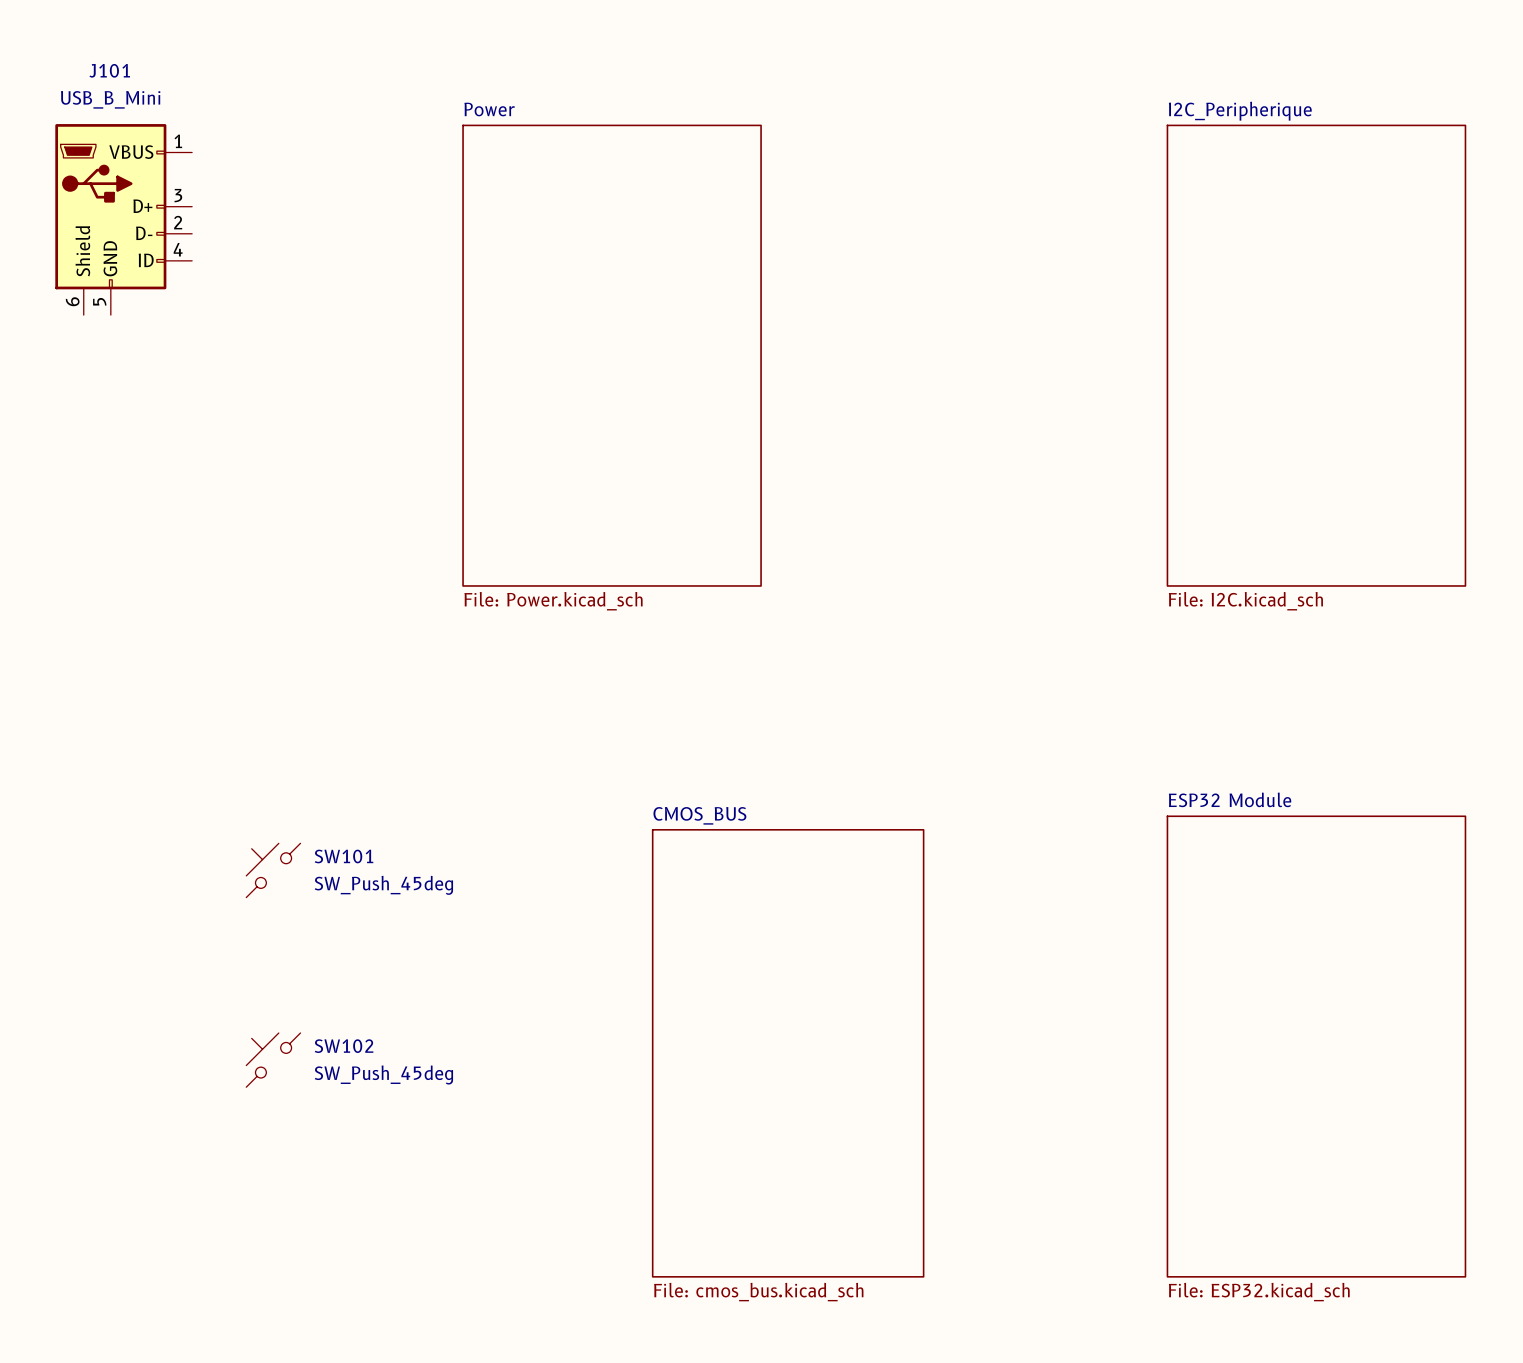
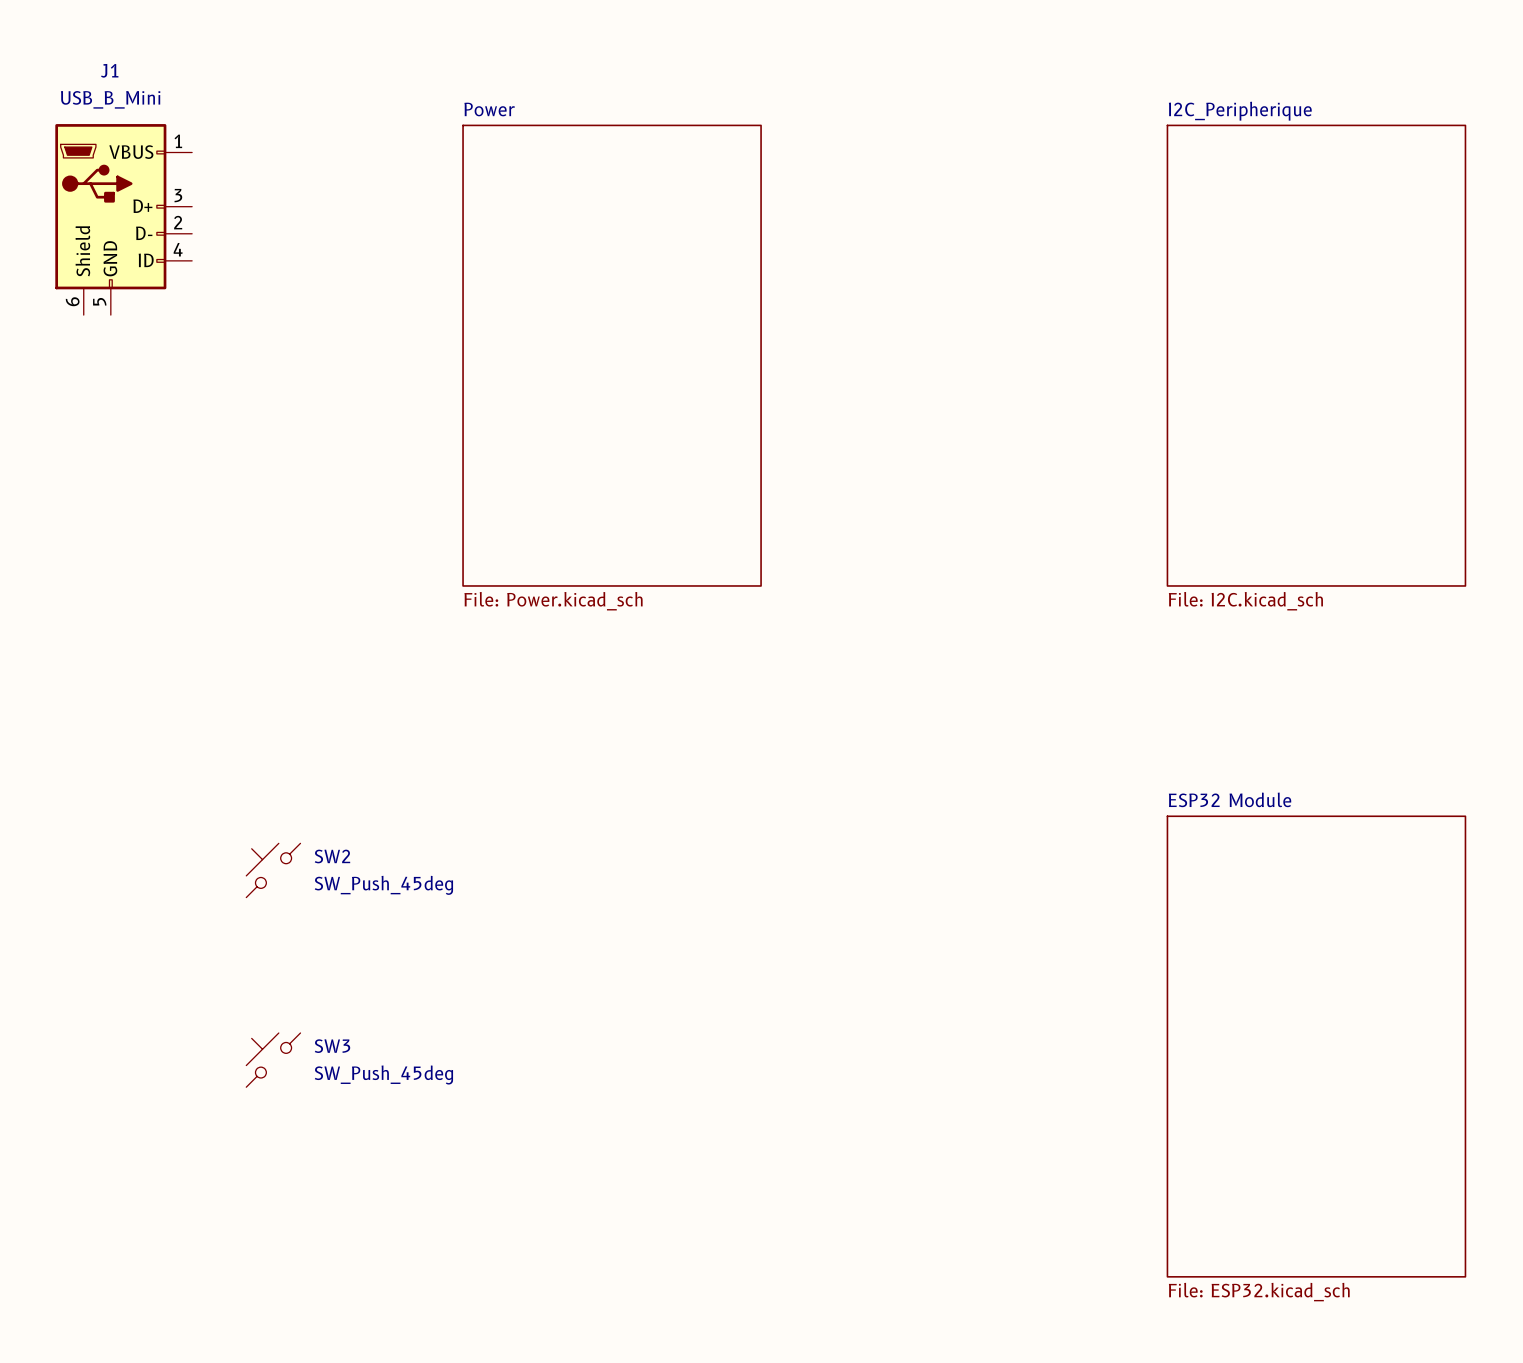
J101 name: J101 (109, 70) -> J1 (109, 70)
SW101 name: SW101 (344, 856) -> SW2 (332, 856)
SW102 name: SW102 (344, 1046) -> SW3 (332, 1046)
sheet CMOS_BUS: File: cmos_bus.kicad_sch (788, 1053) -> none

